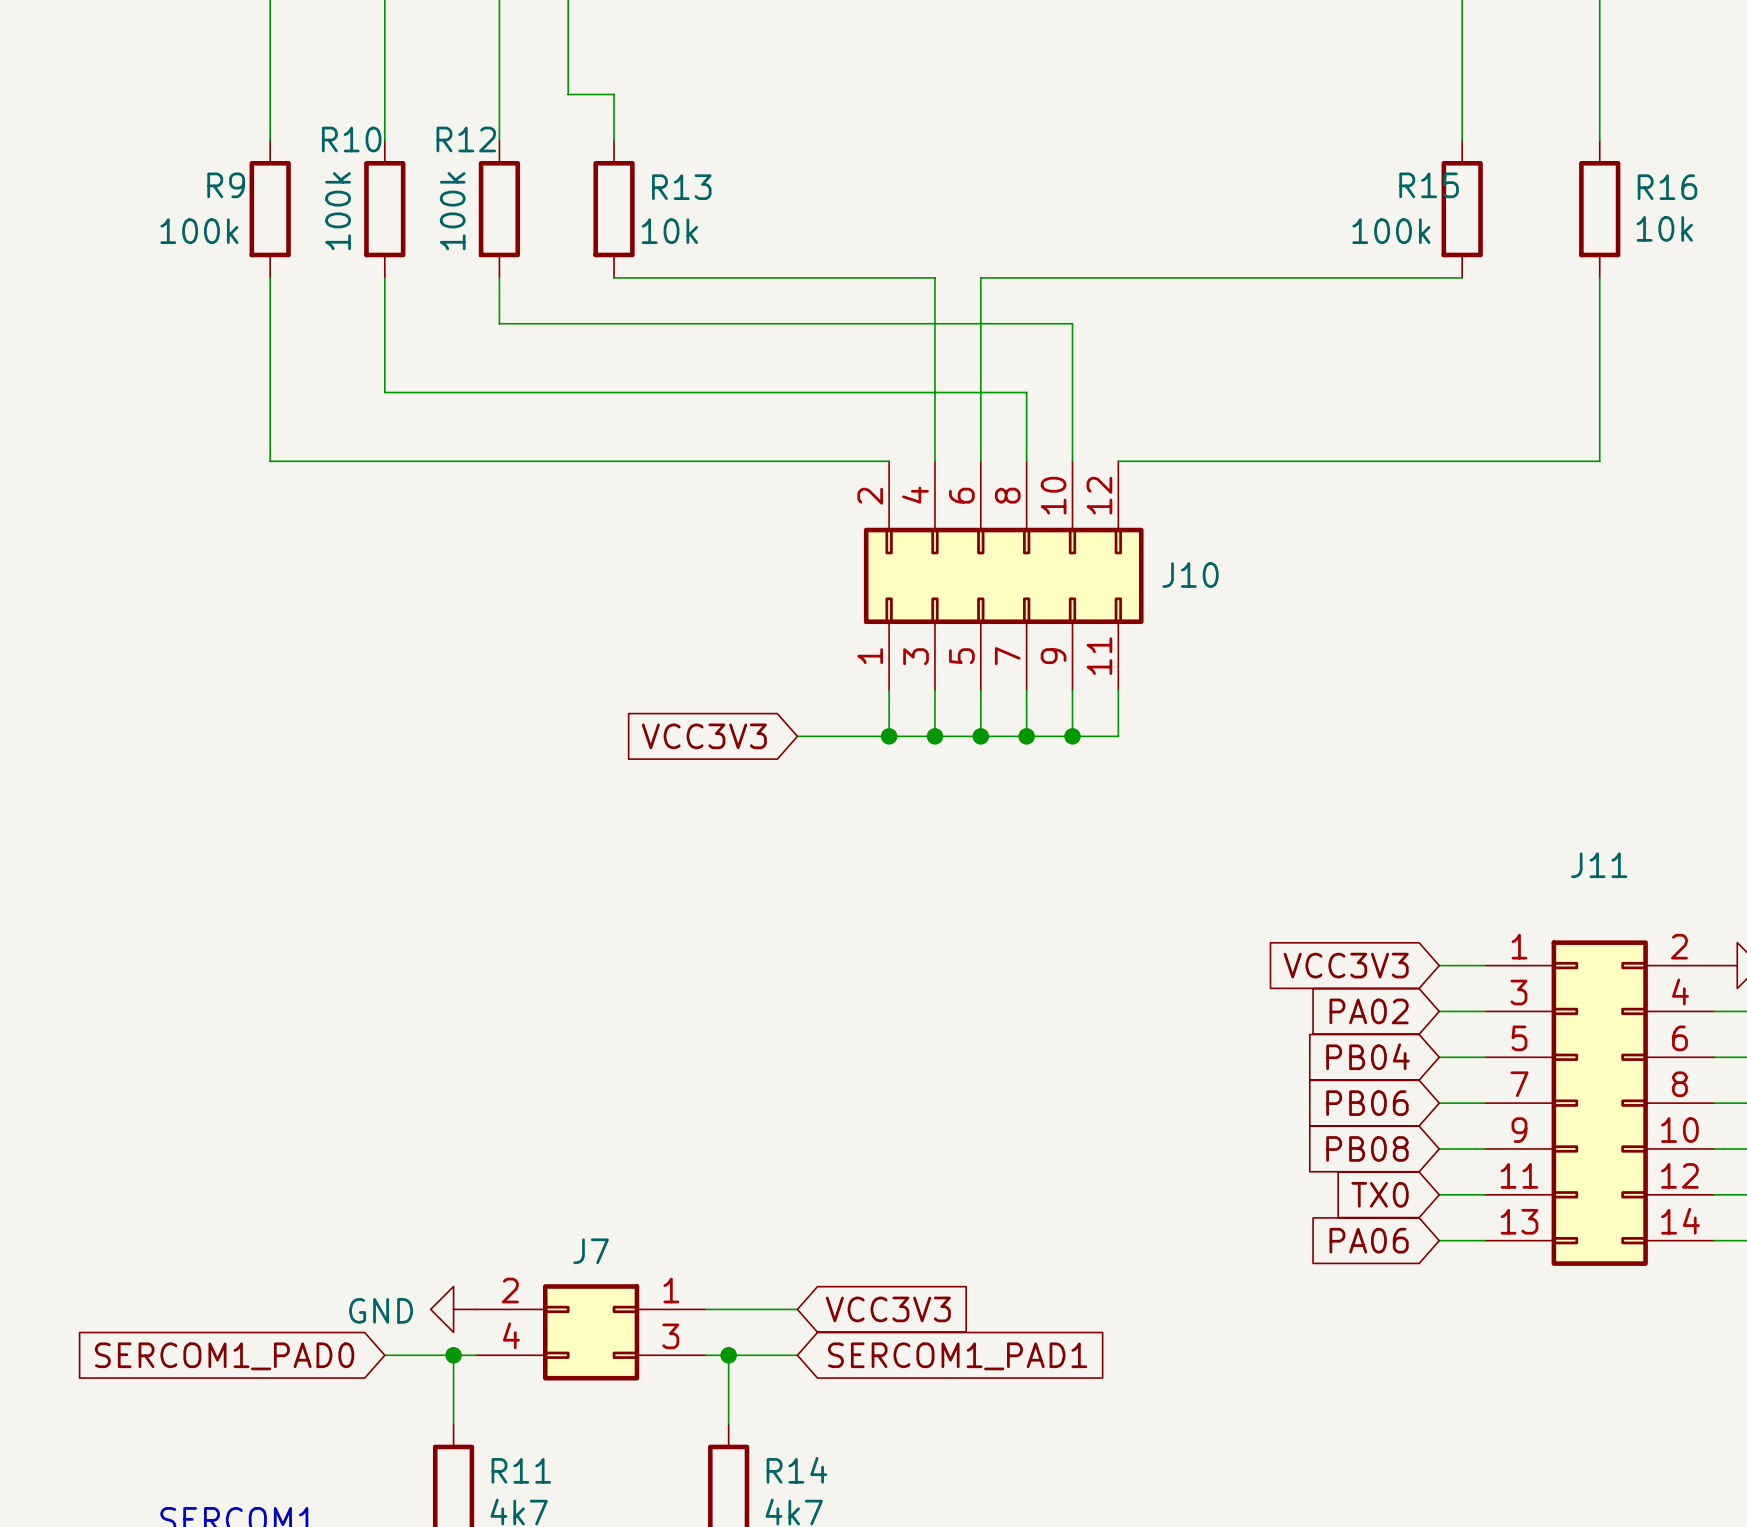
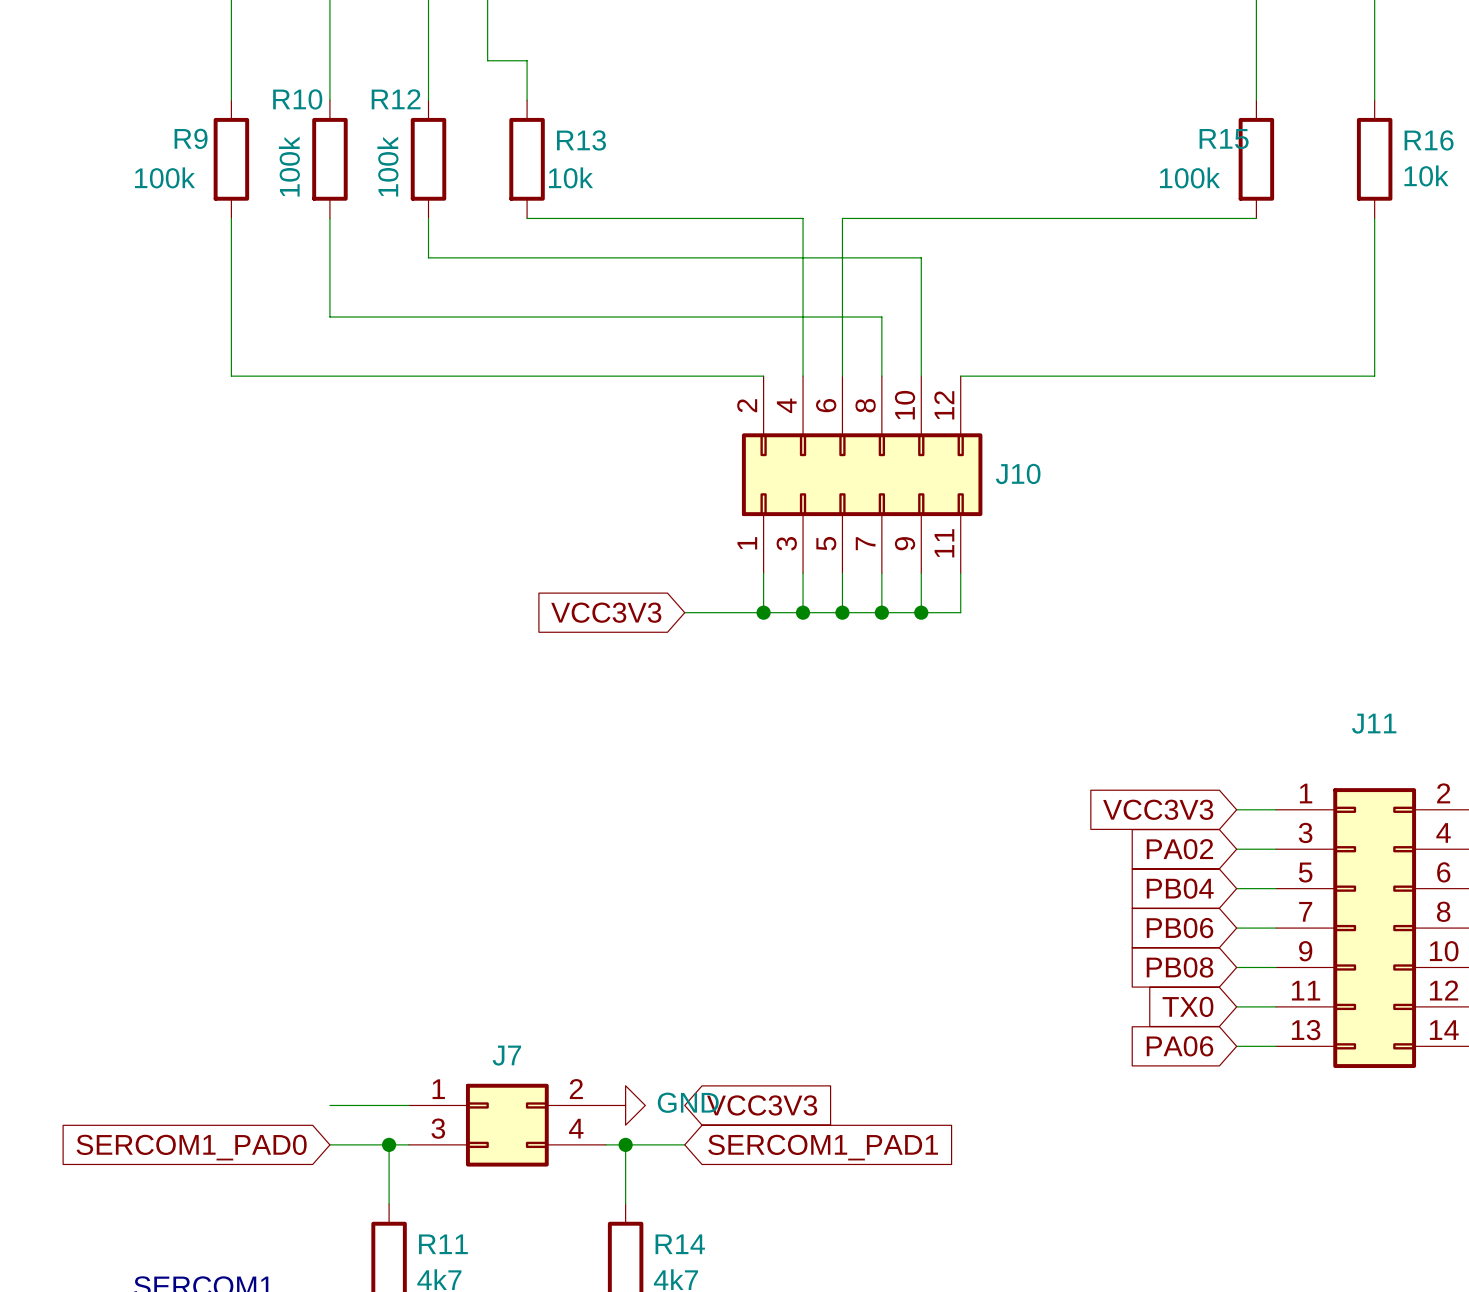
power symbol rotation: 0° (453, 1309) -> 180° (625, 1105)
power symbol position: GND (453, 1309) -> GND (625, 1105)
wire: (705, 1309) (797, 1309) -> (329, 1105) (408, 1105)
J7 flip: as is (591, 1332) -> left-right (507, 1125)

